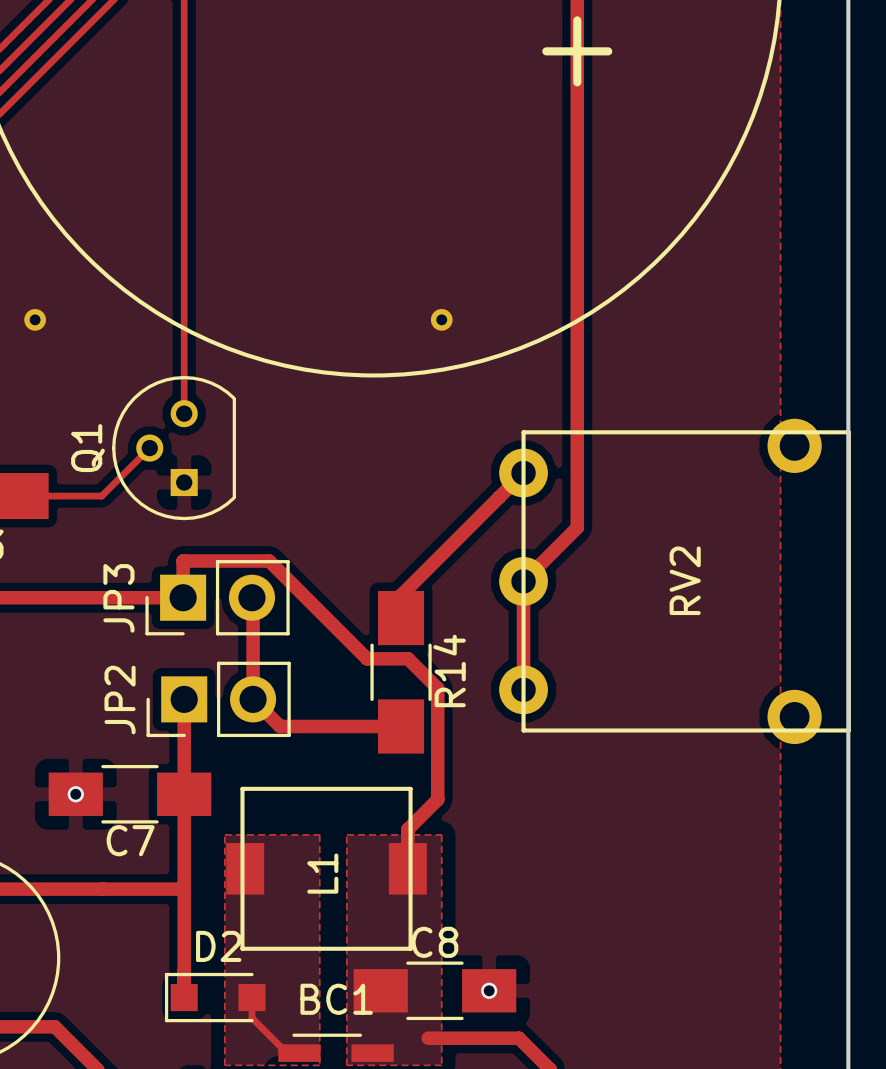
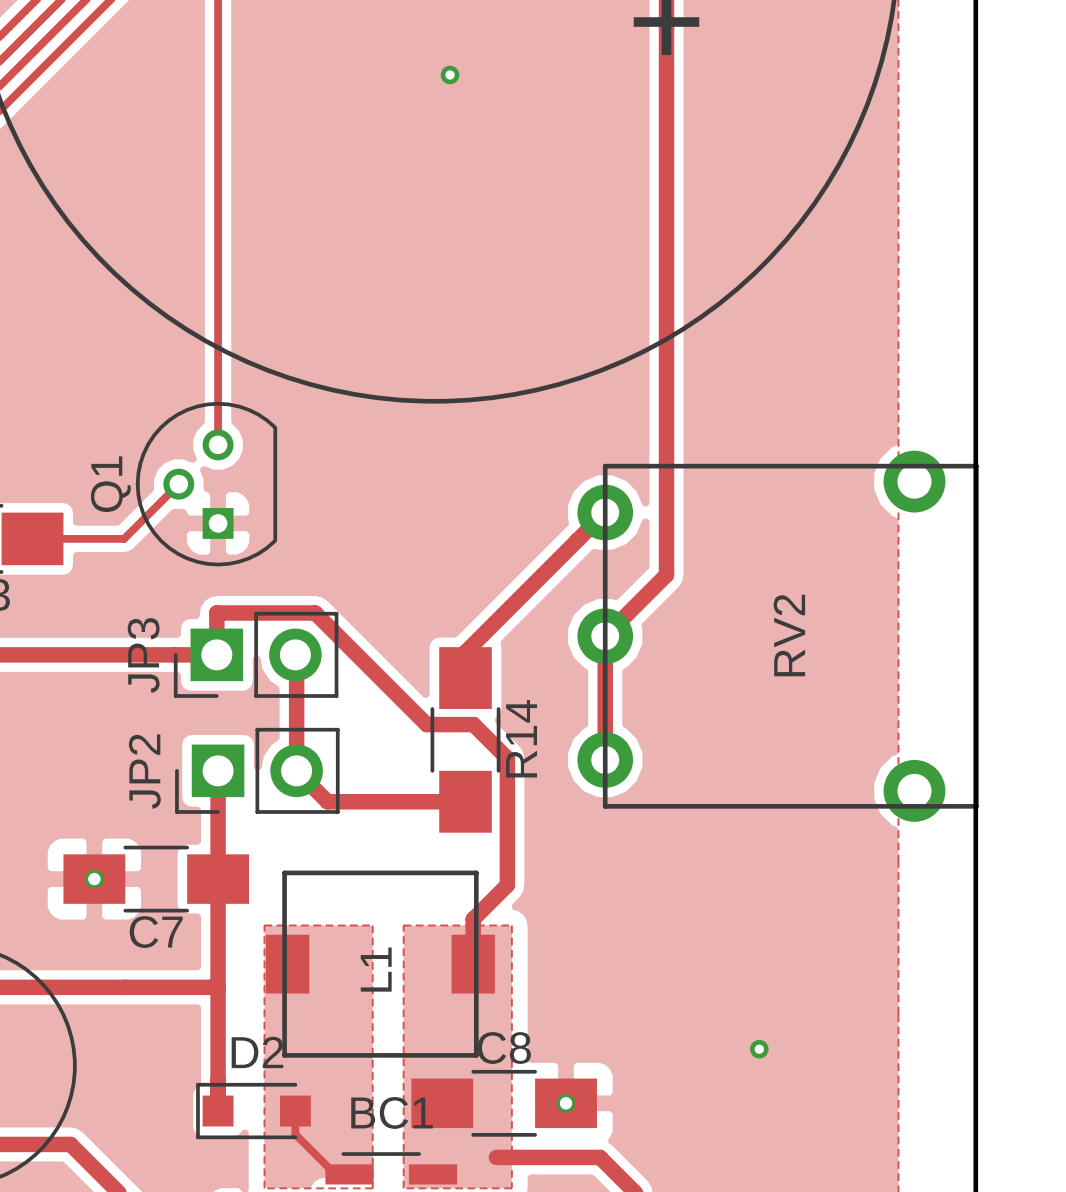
part: none -> (450, 74)
part: (35, 319) -> none
part: (441, 319) -> none
part: none -> (759, 1049)

